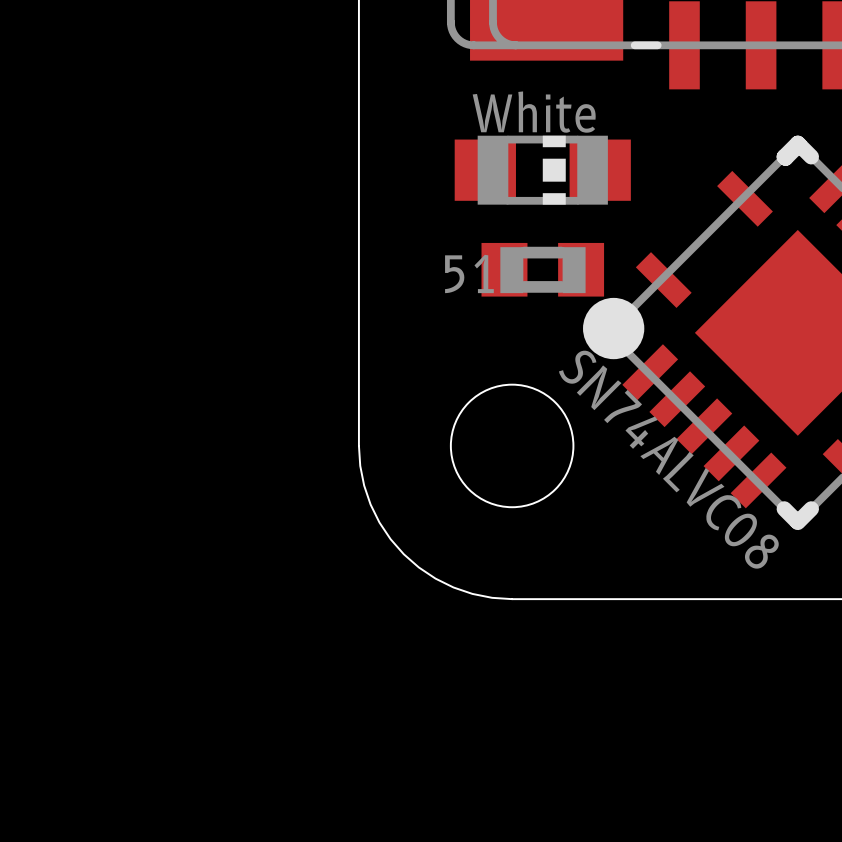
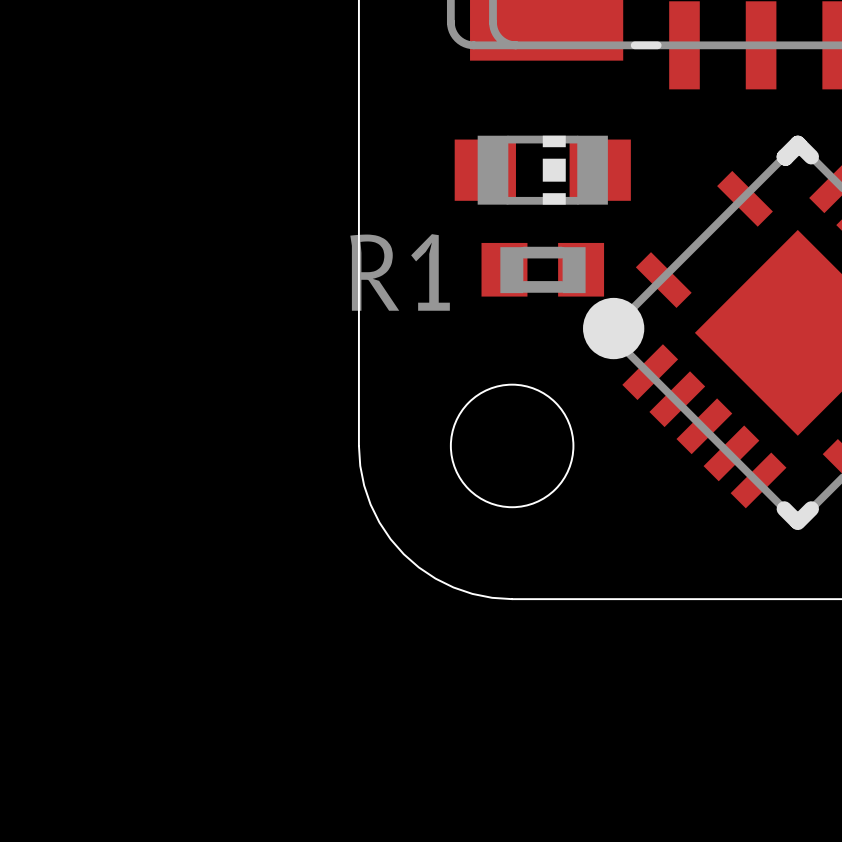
part value: White (534, 112) -> none
R1 name: none -> R1 (400, 272)
R1 value: 51 (469, 273) -> none
part value: SN74ALVC08 (668, 459) -> none

